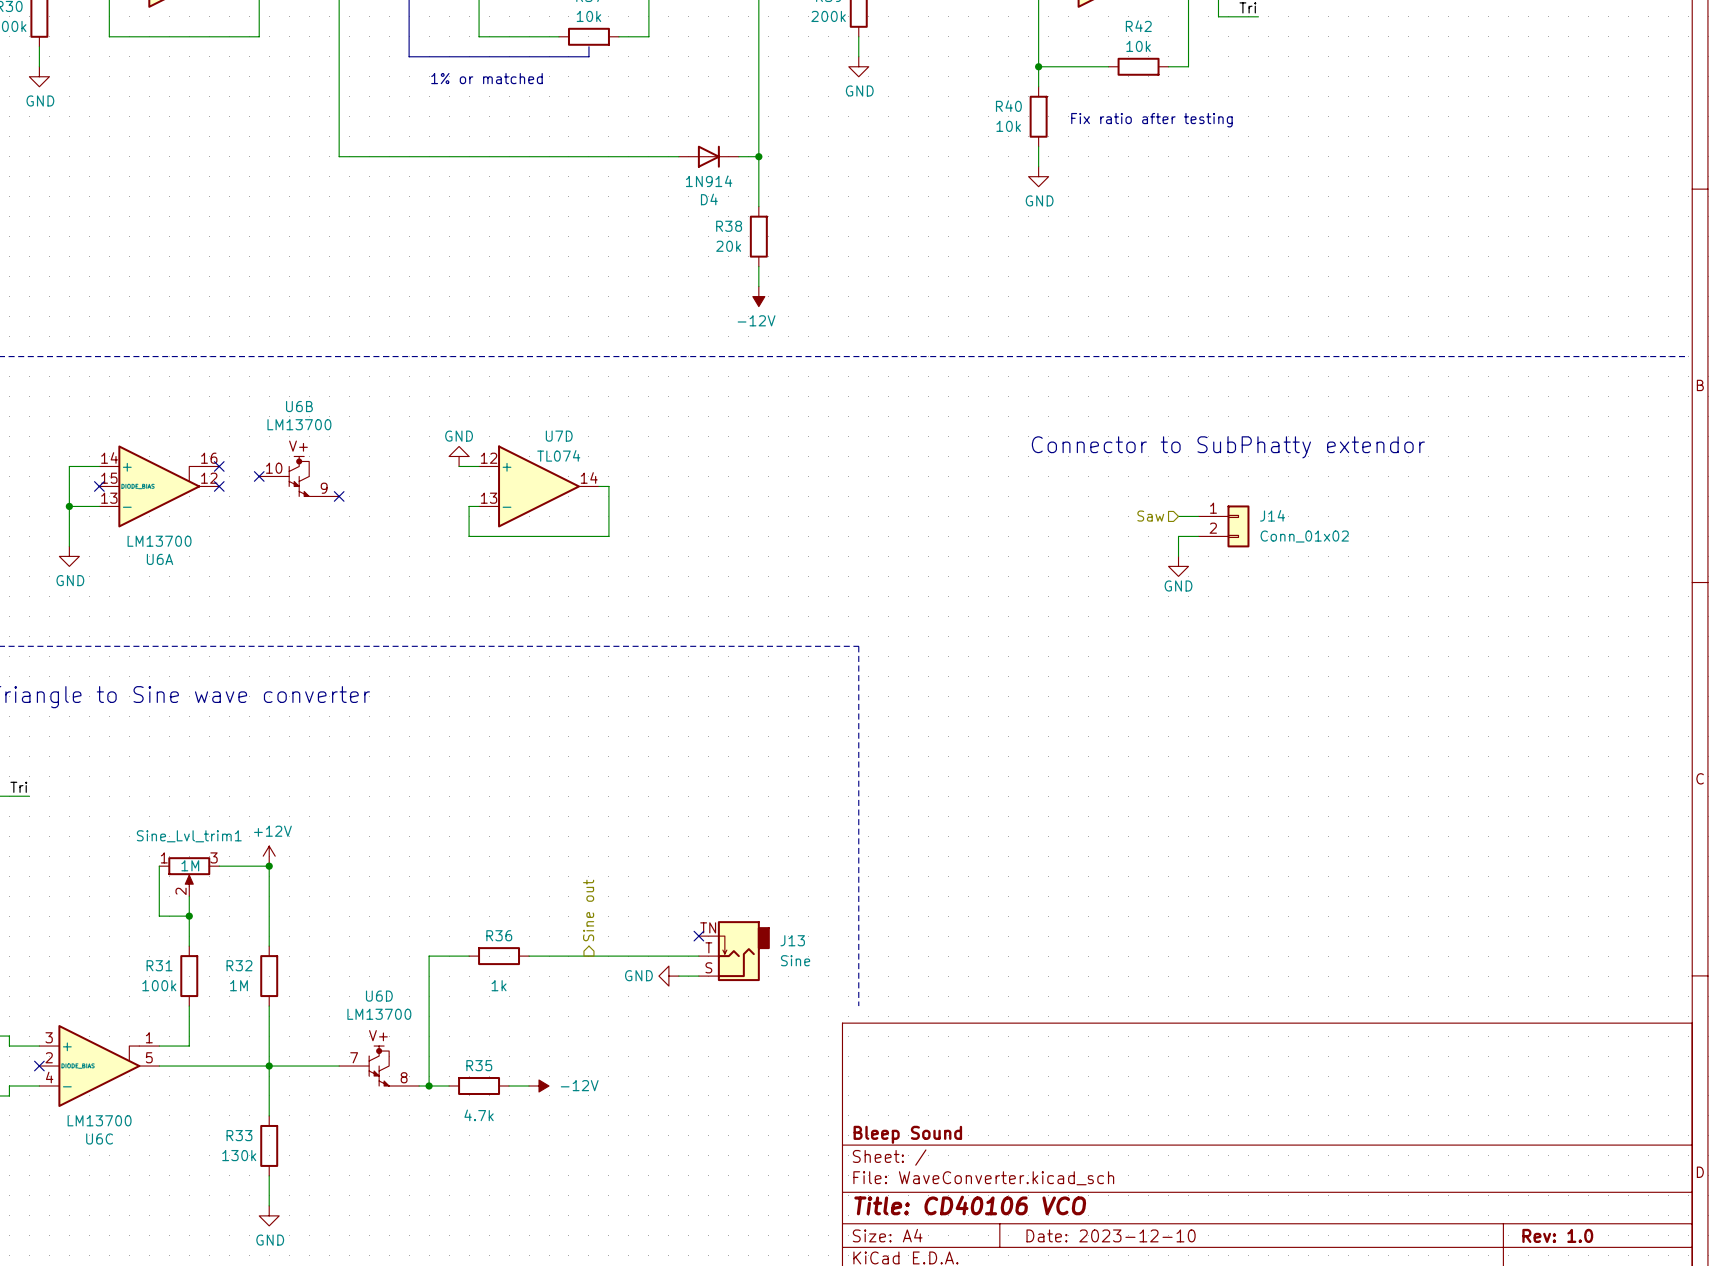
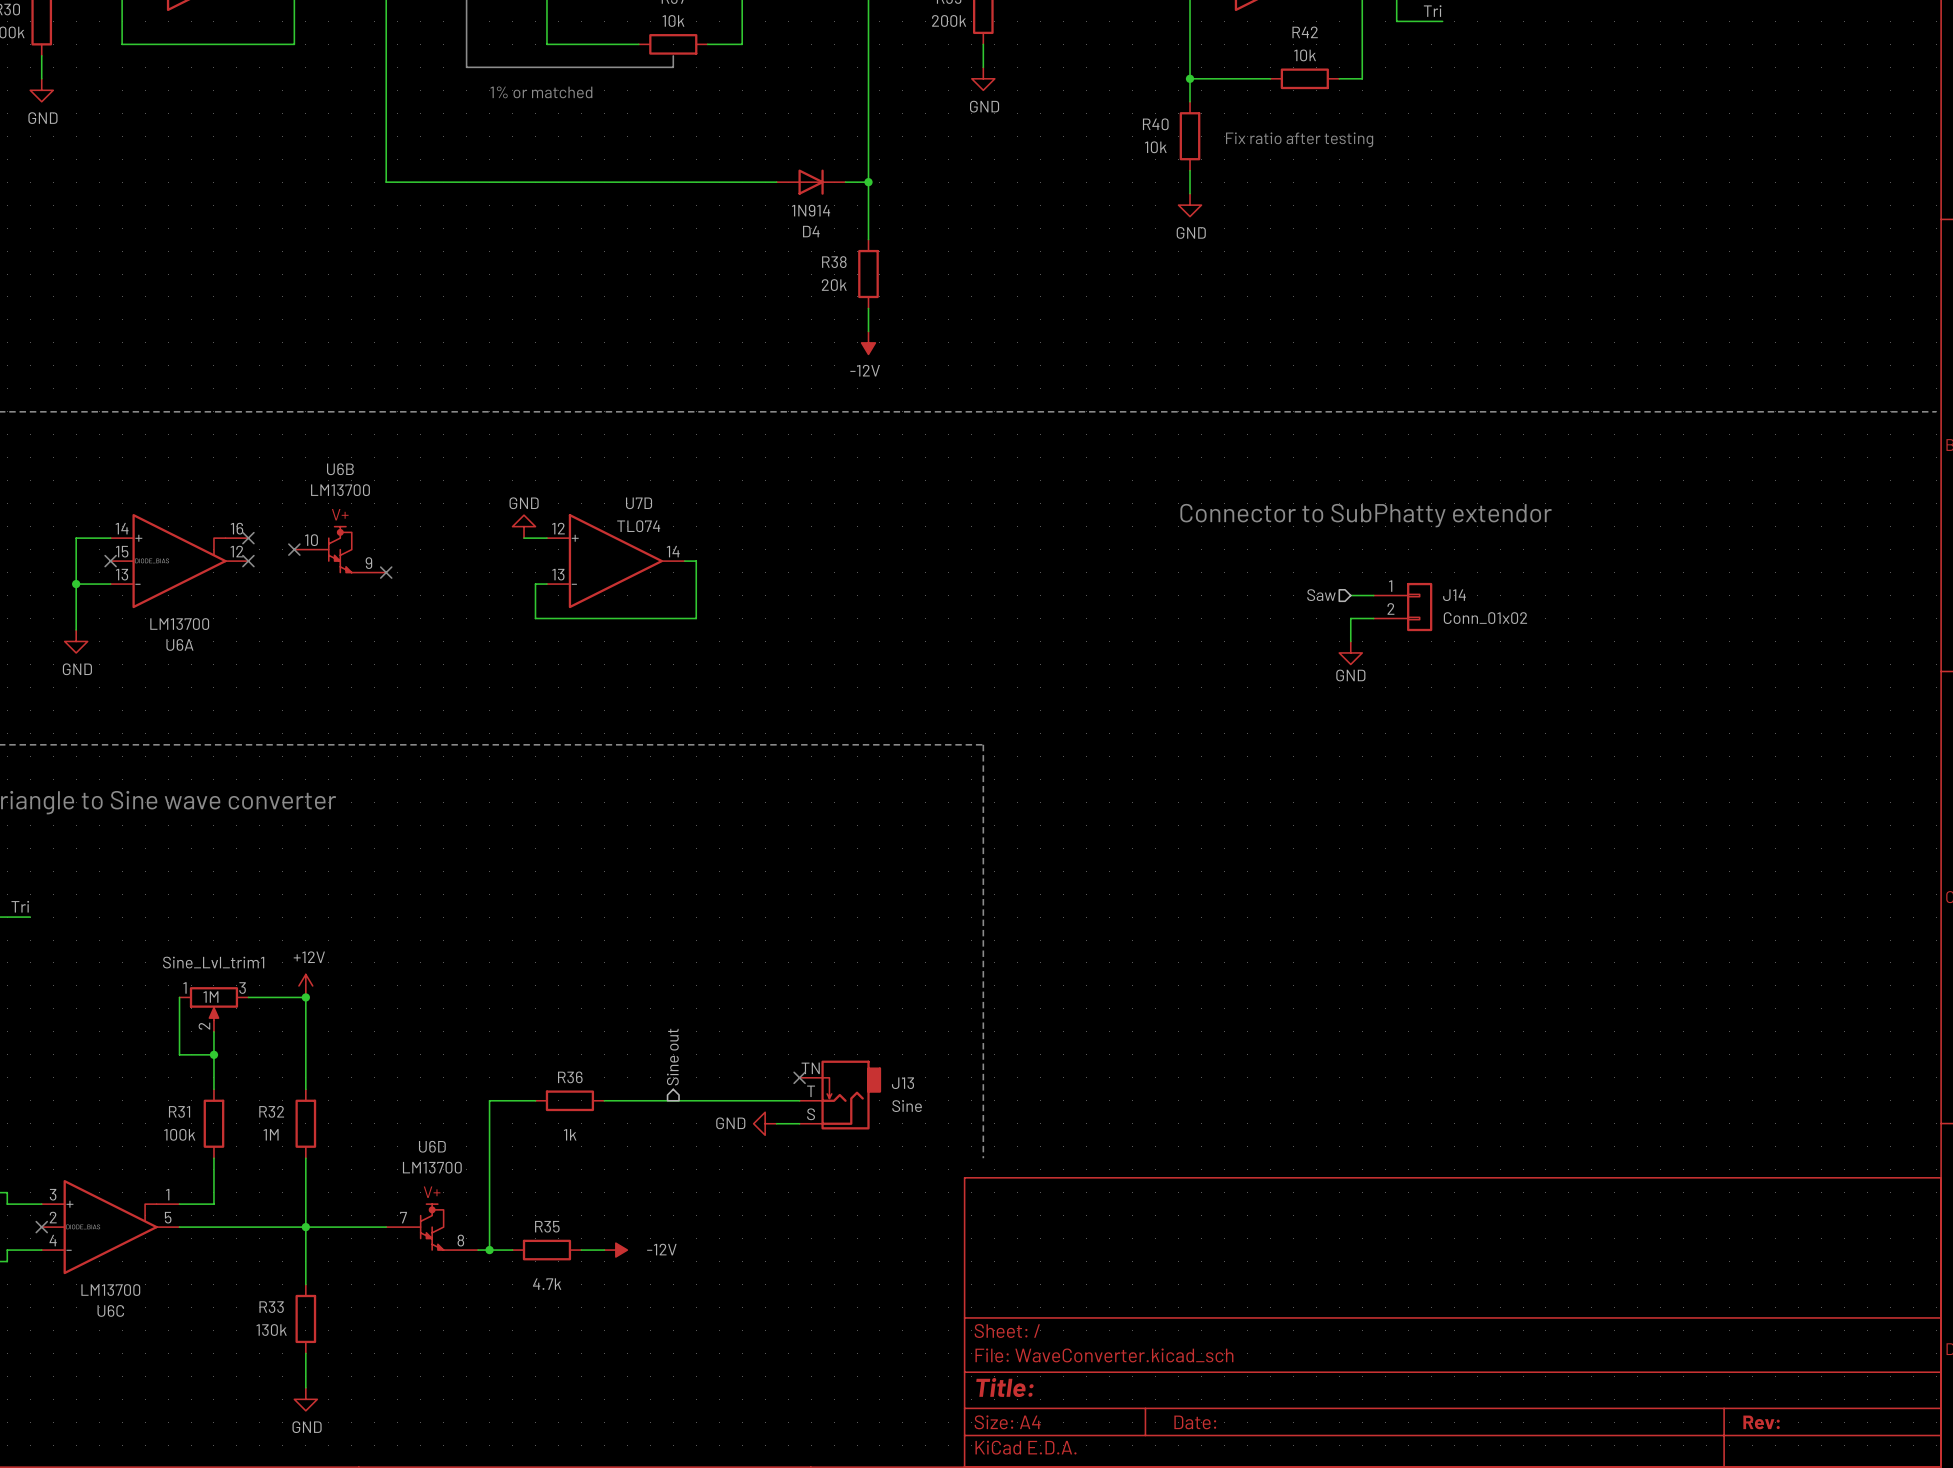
title block: Bleep Sound (907, 1134) -> none
title block: Title: CD40106 VCO (970, 1205) -> Title: (1004, 1387)
title block: Date: 2023-12-10 (1111, 1235) -> Date: (1195, 1422)
title block: Rev: 1.0 (1557, 1235) -> Rev: (1761, 1422)

